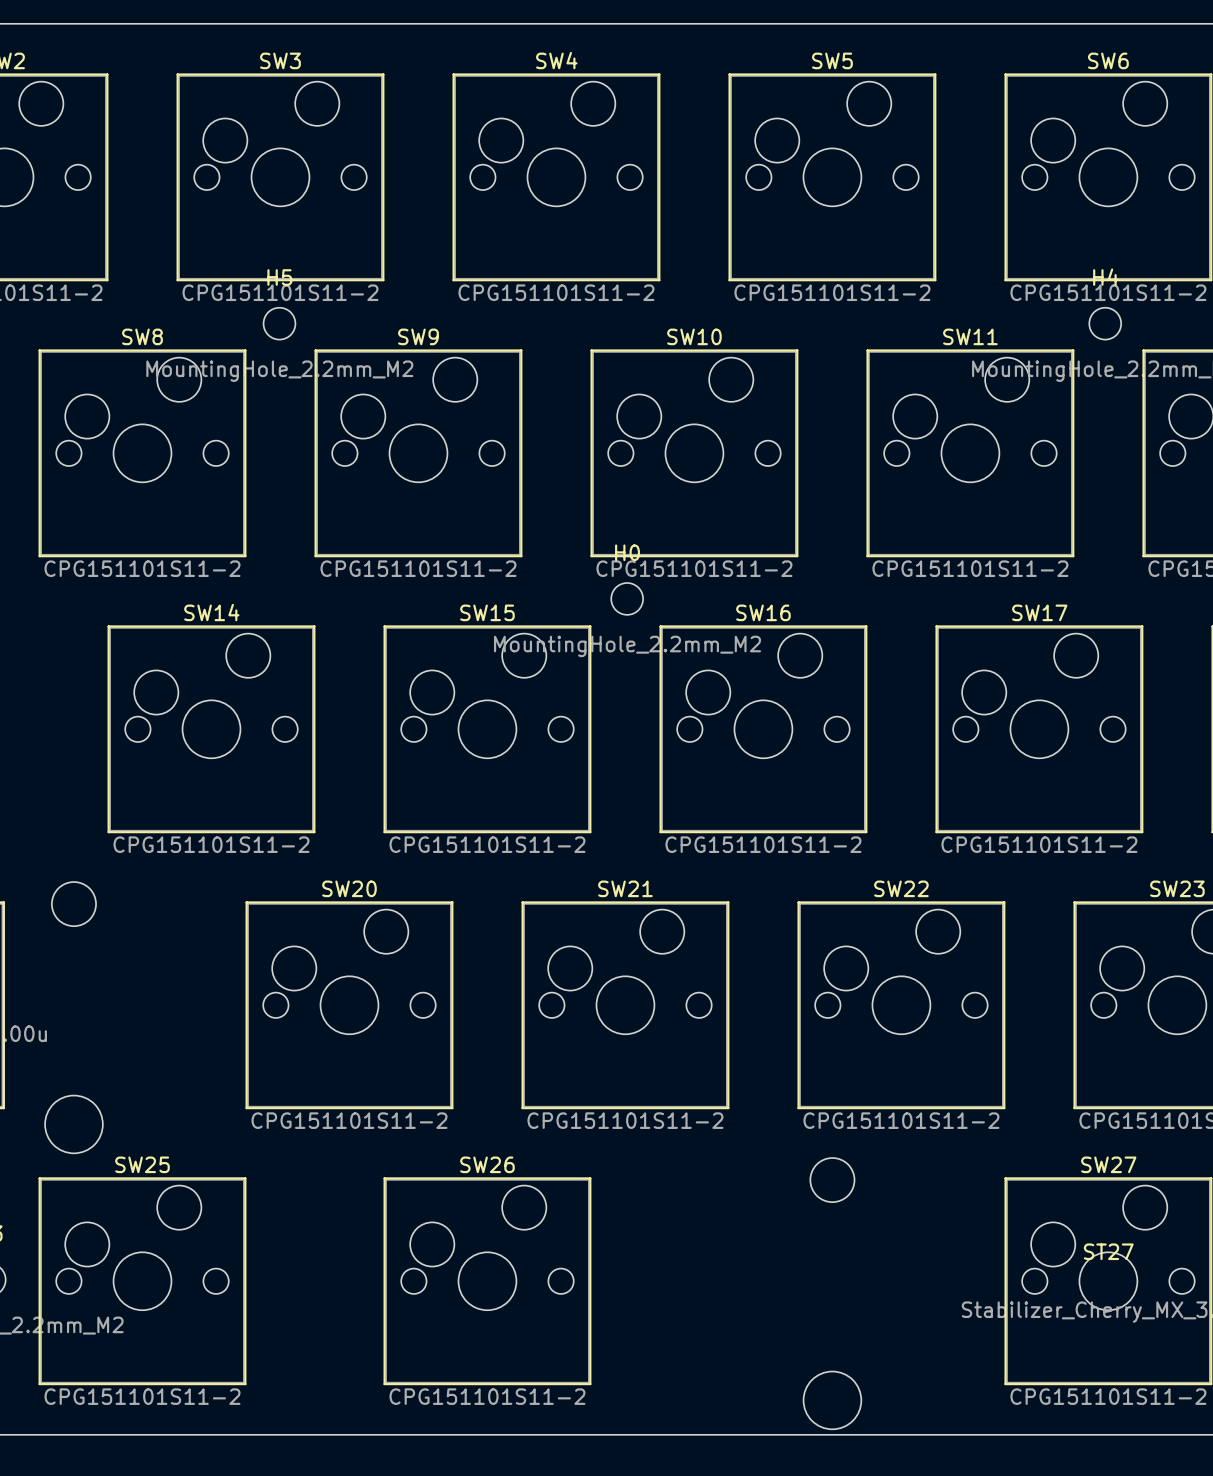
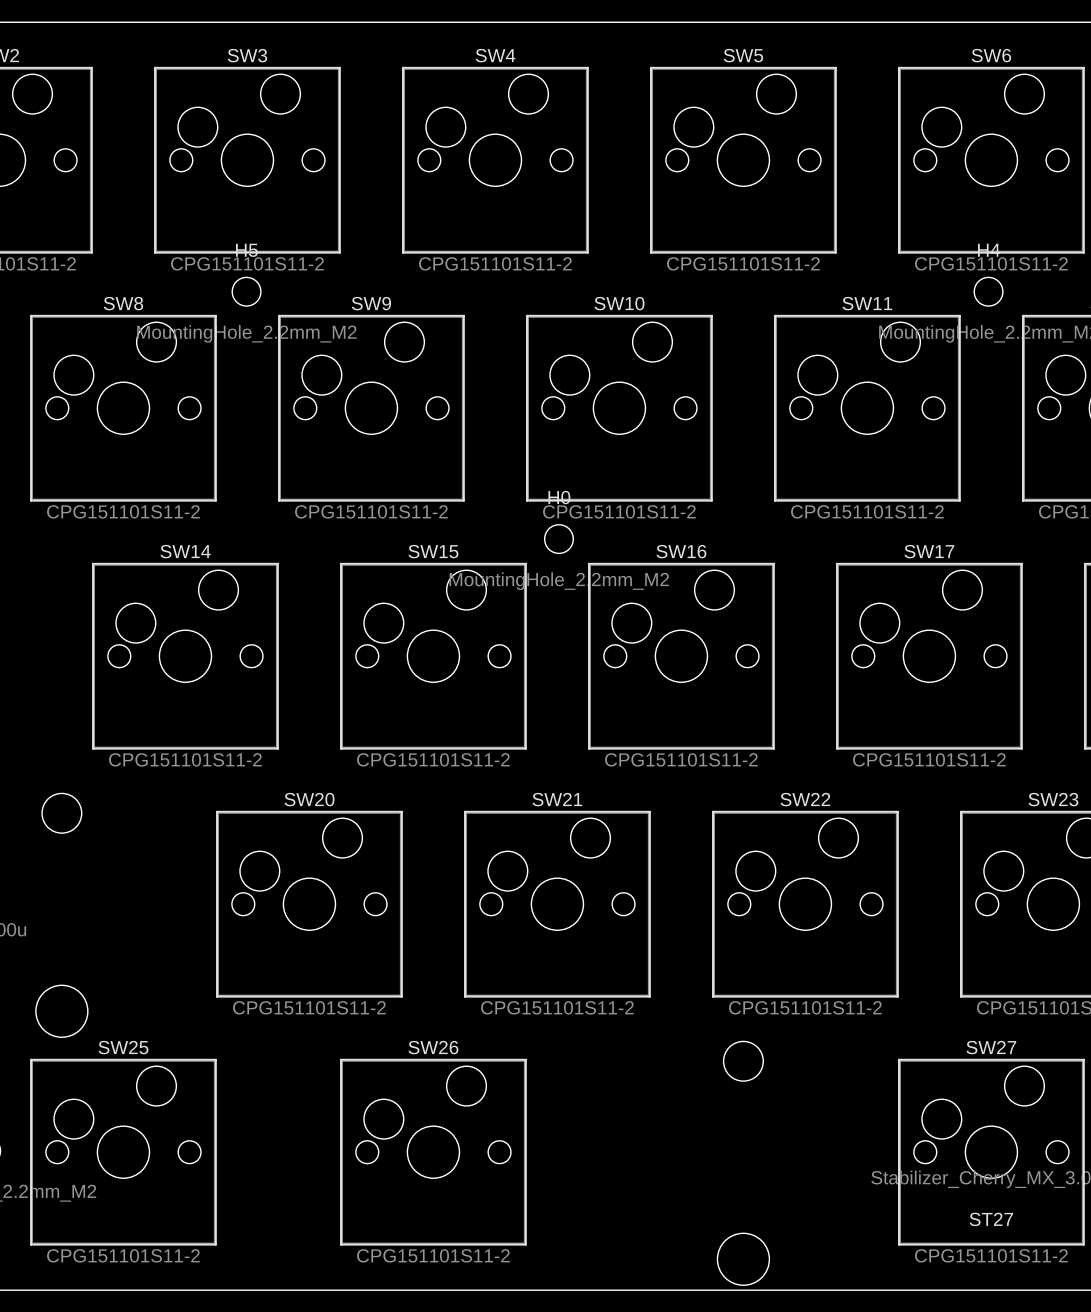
ST27 name position: ST27 (1108, 1251) -> ST27 (991, 1219)

